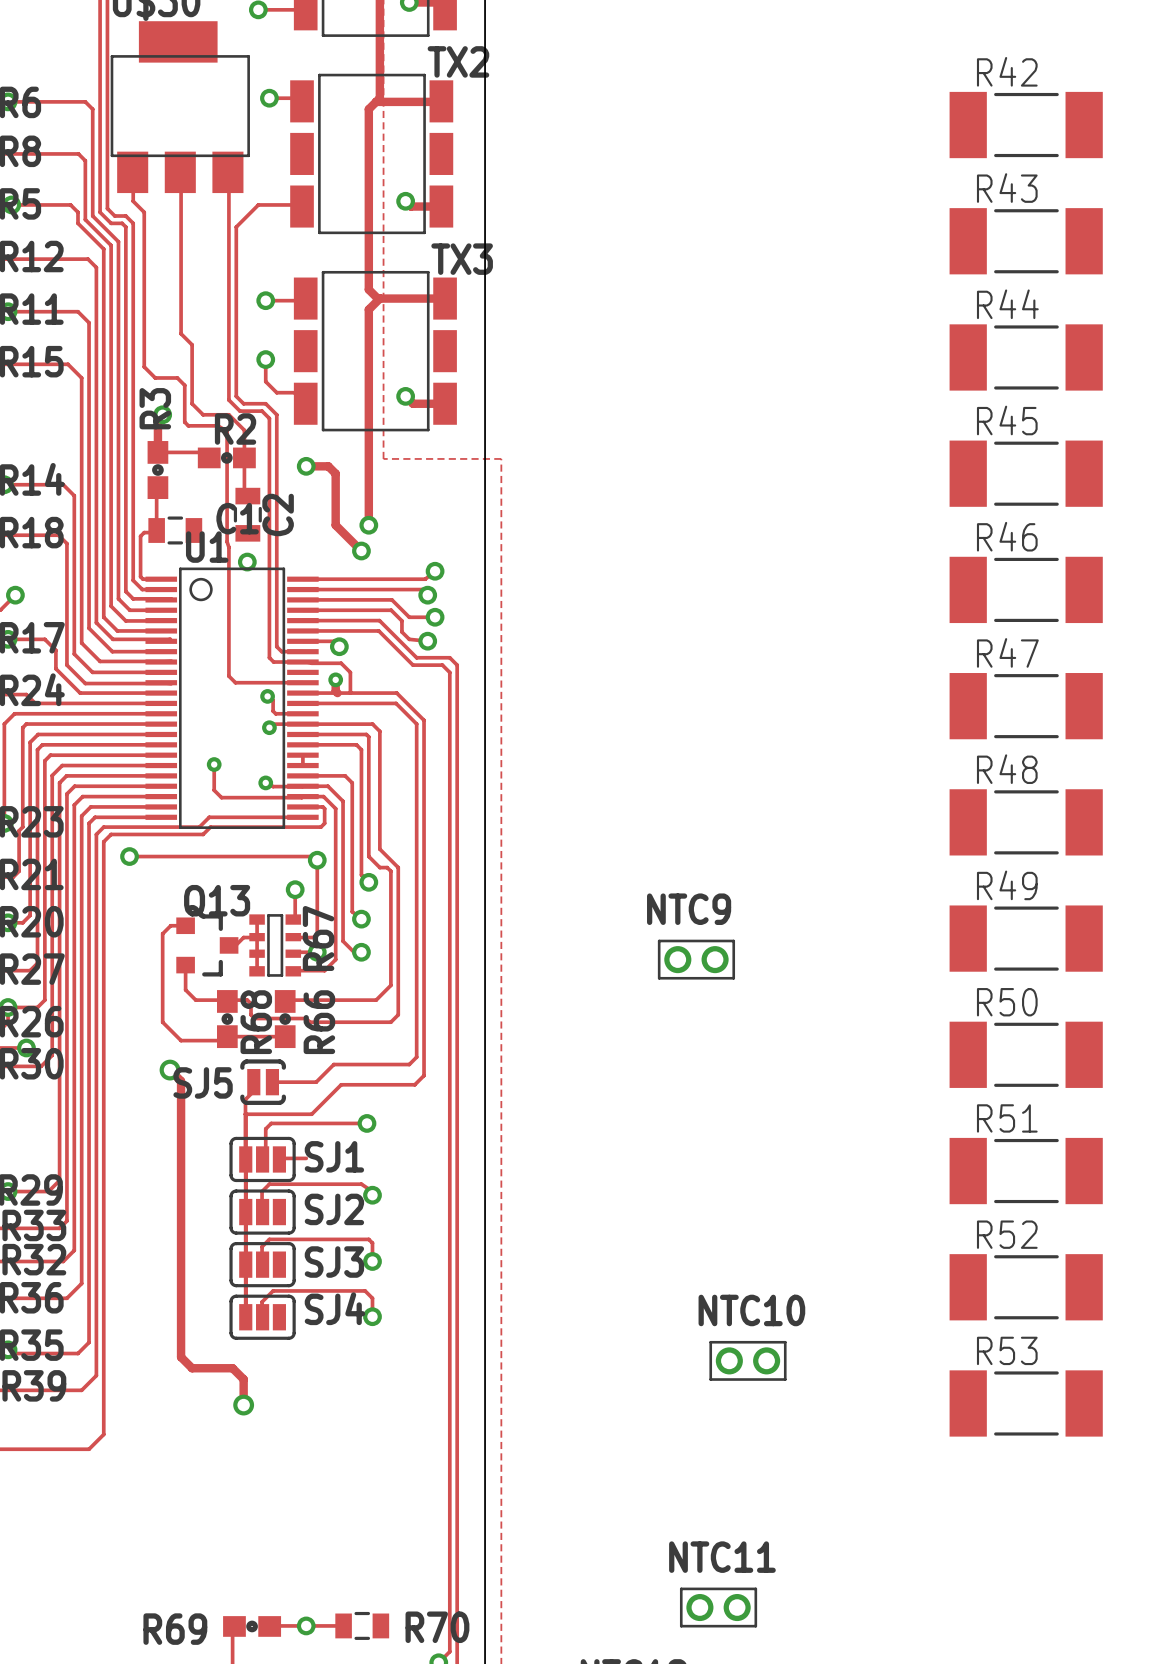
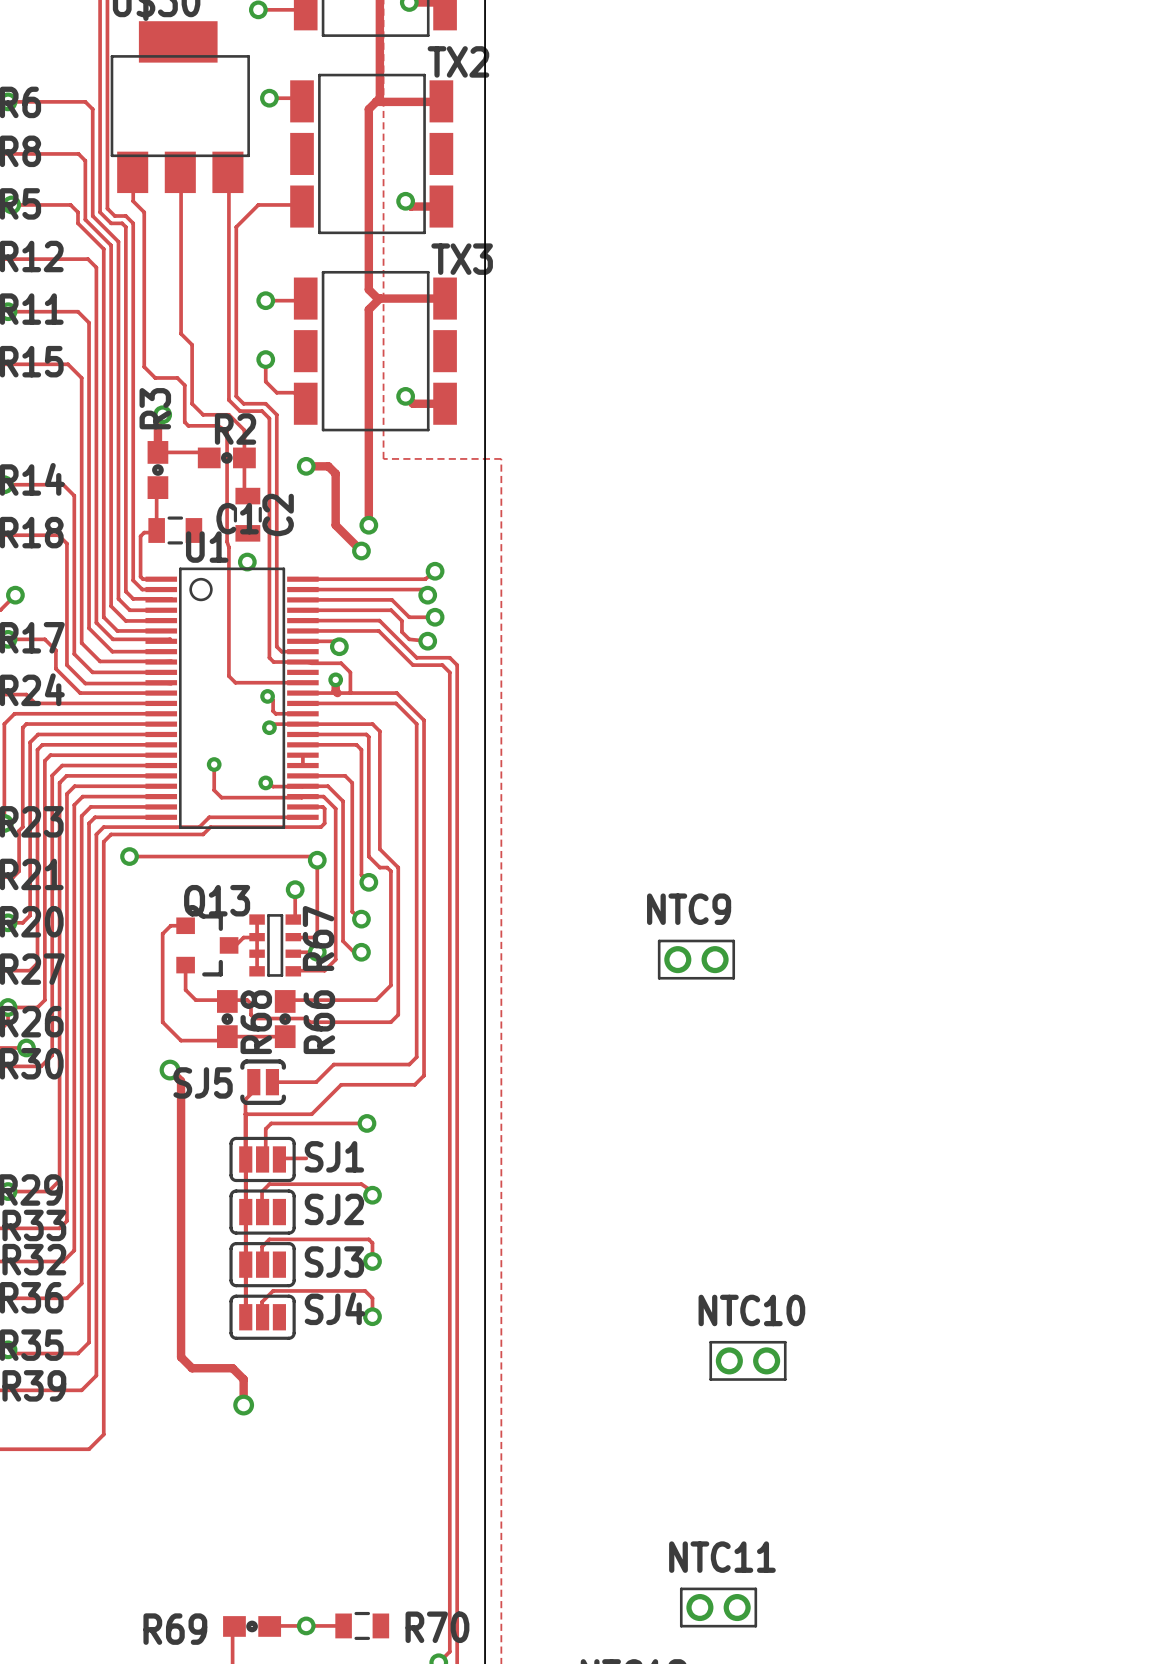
R42: (1026, 125) -> none
R43: (1026, 241) -> none
R44: (1026, 357) -> none
R45: (1026, 473) -> none
R46: (1026, 589) -> none
R47: (1026, 706) -> none
R48: (1026, 822) -> none
R49: (1026, 938) -> none
R50: (1026, 1054) -> none
R51: (1026, 1171) -> none
R52: (1026, 1287) -> none
R53: (1026, 1403) -> none

